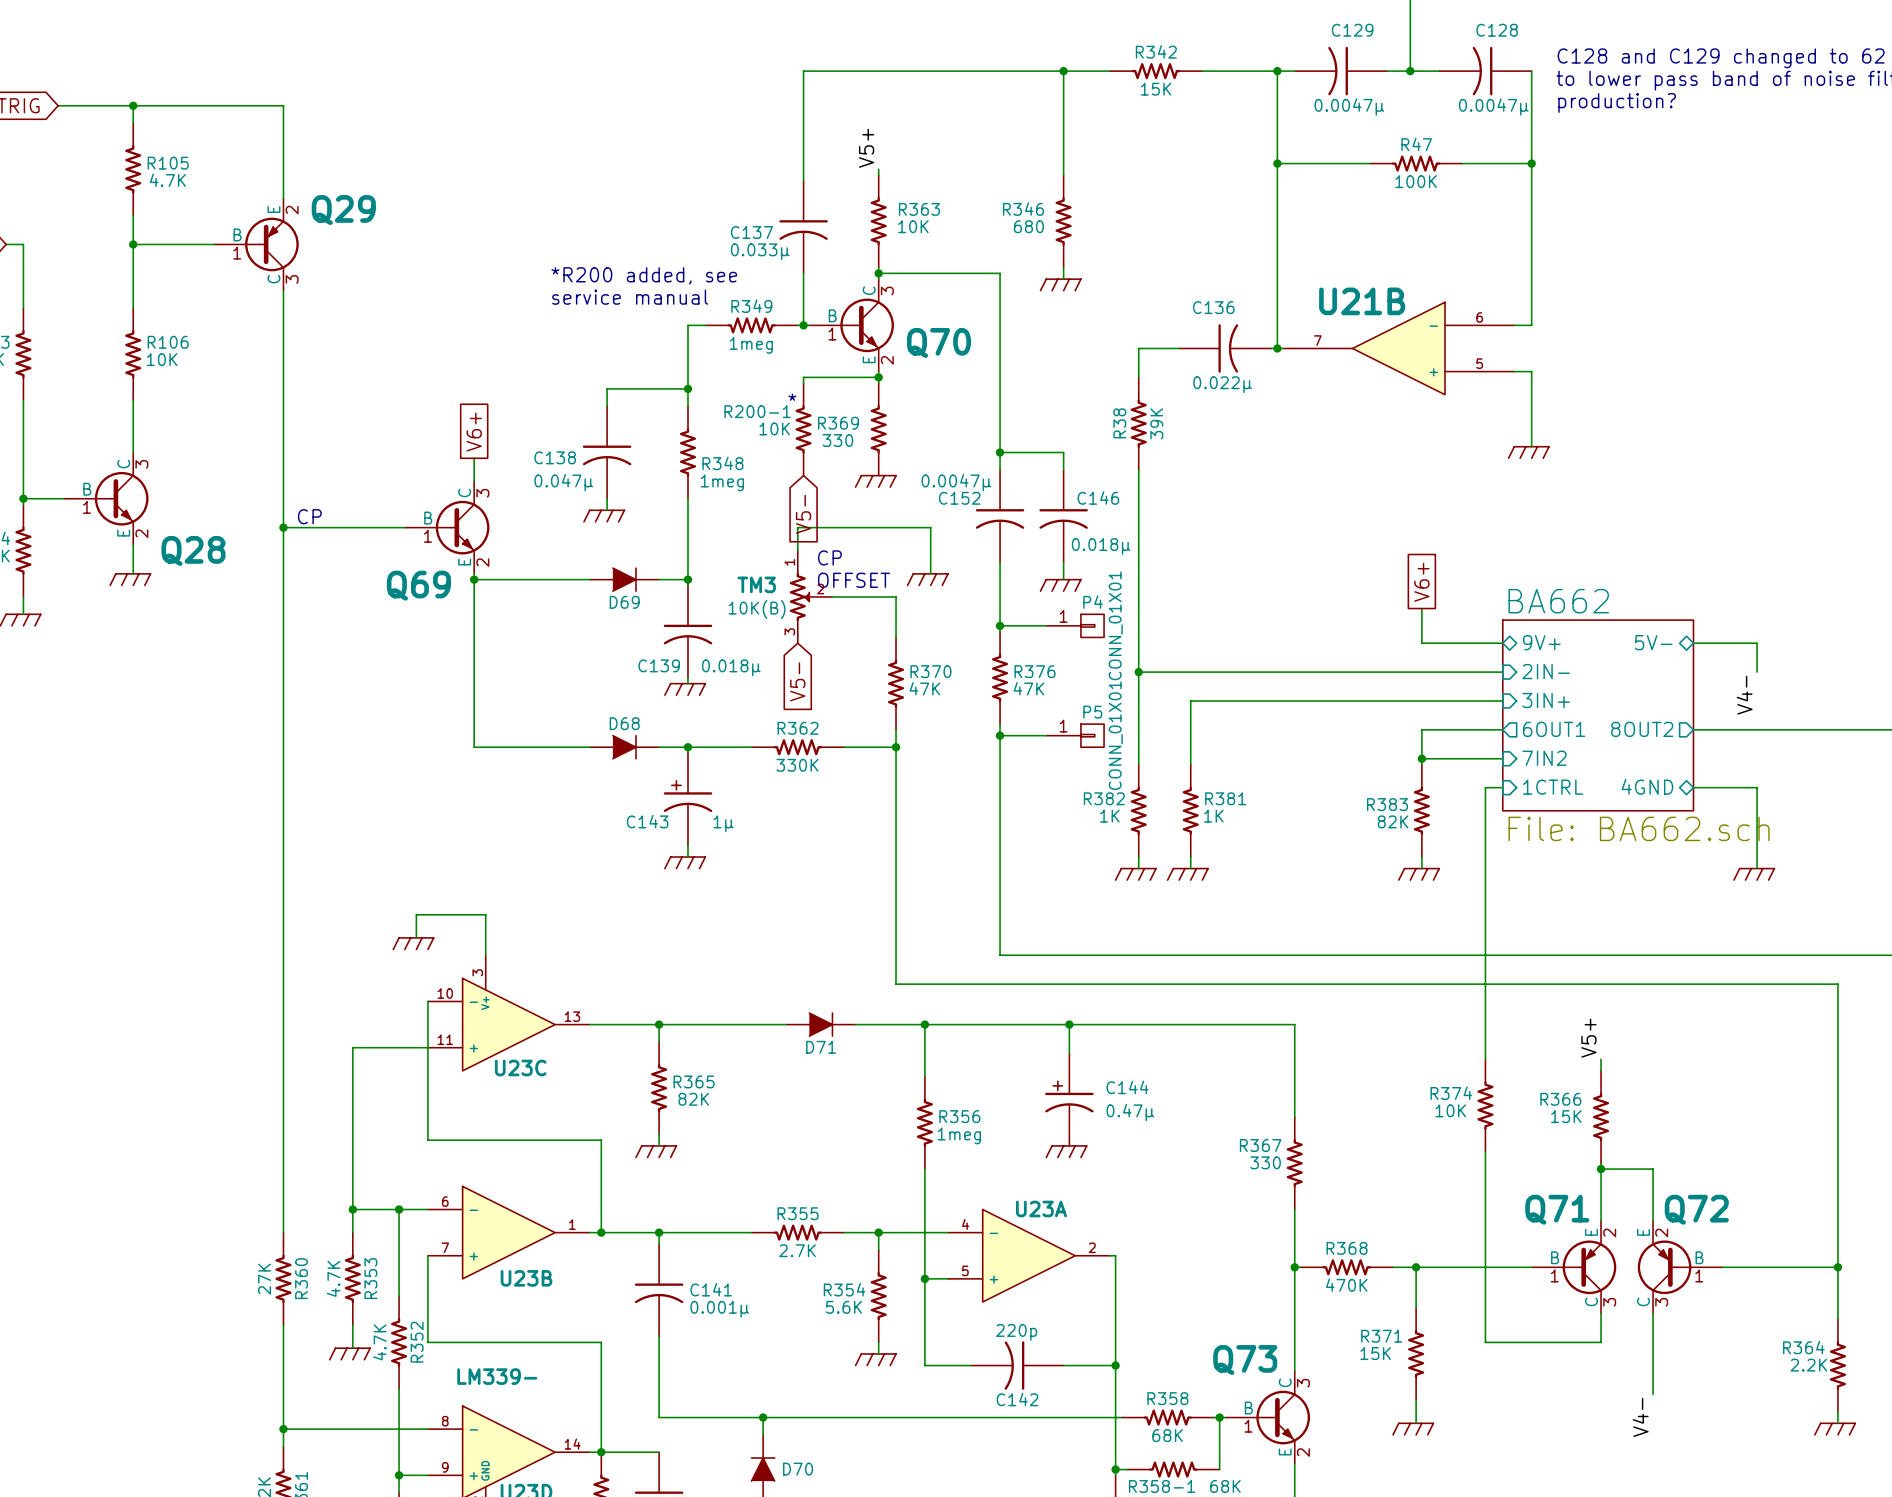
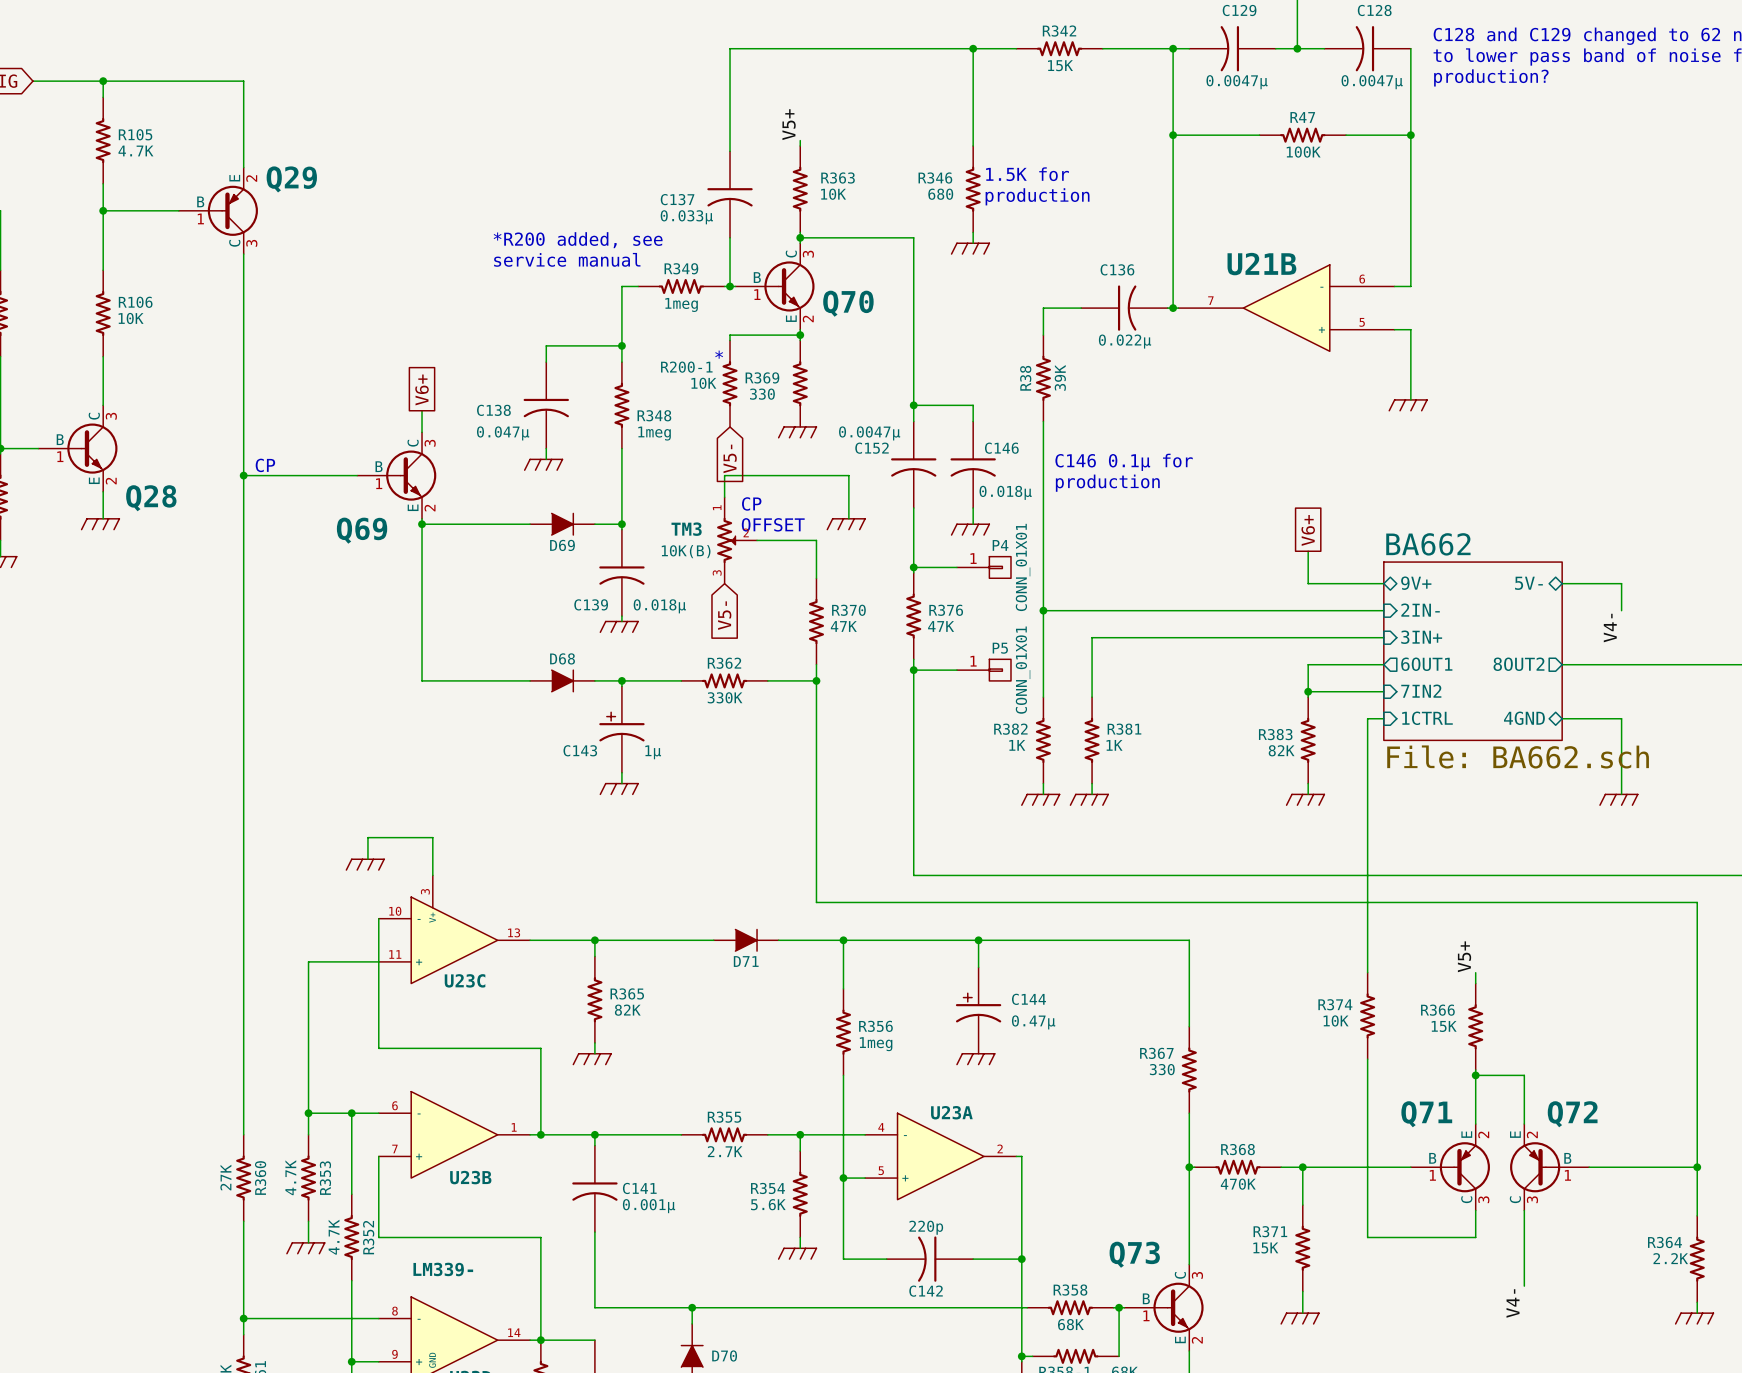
text: none -> 1.5K for (1027, 174)
text: none -> production (1037, 196)
text: none -> C146 0.1μ for (1124, 462)
text: none -> production (1107, 483)

